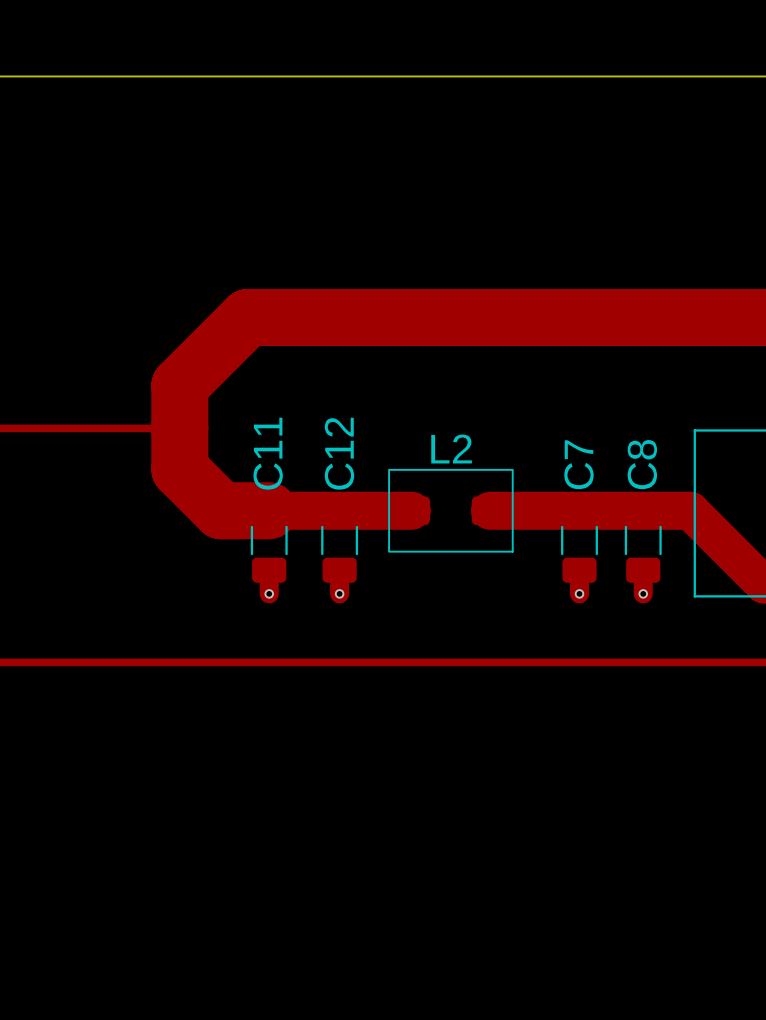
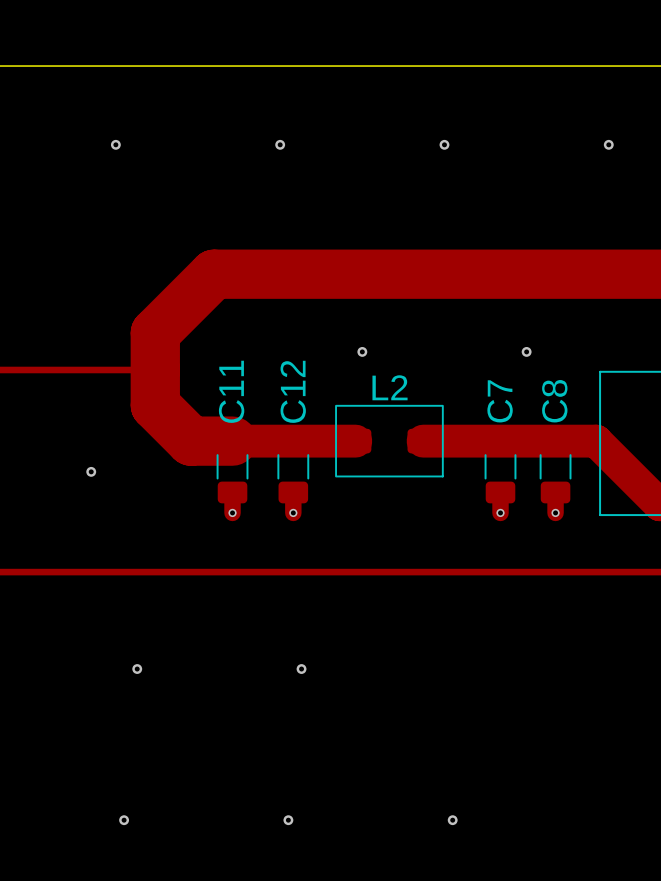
via: none -> (115, 144)
via: none -> (280, 144)
via: none -> (444, 144)
via: none -> (608, 144)
via: none -> (362, 351)
via: none -> (526, 351)
via: none -> (91, 471)
via: none -> (137, 669)
via: none -> (301, 669)
via: none -> (124, 820)
via: none -> (288, 820)
via: none -> (452, 820)

